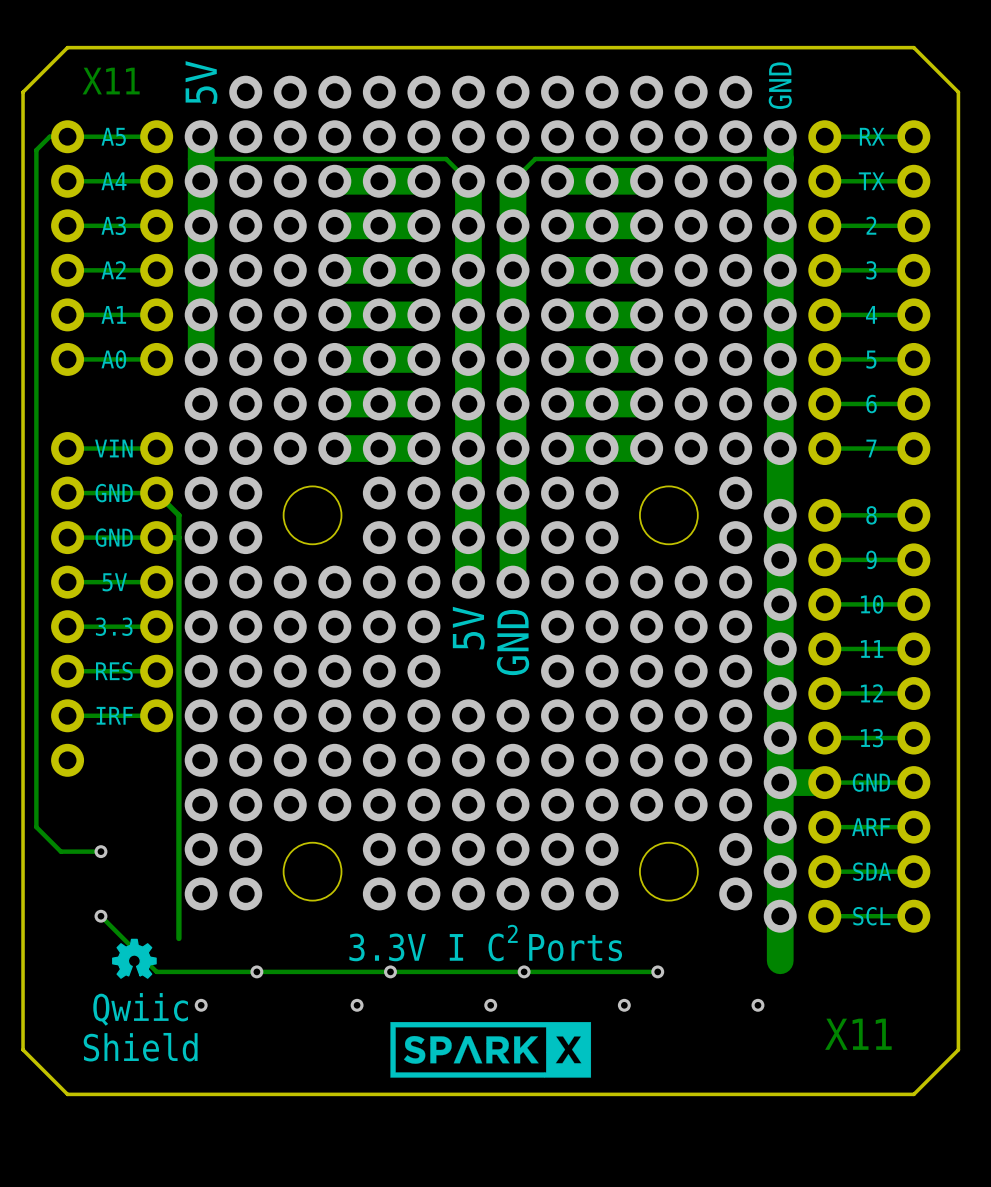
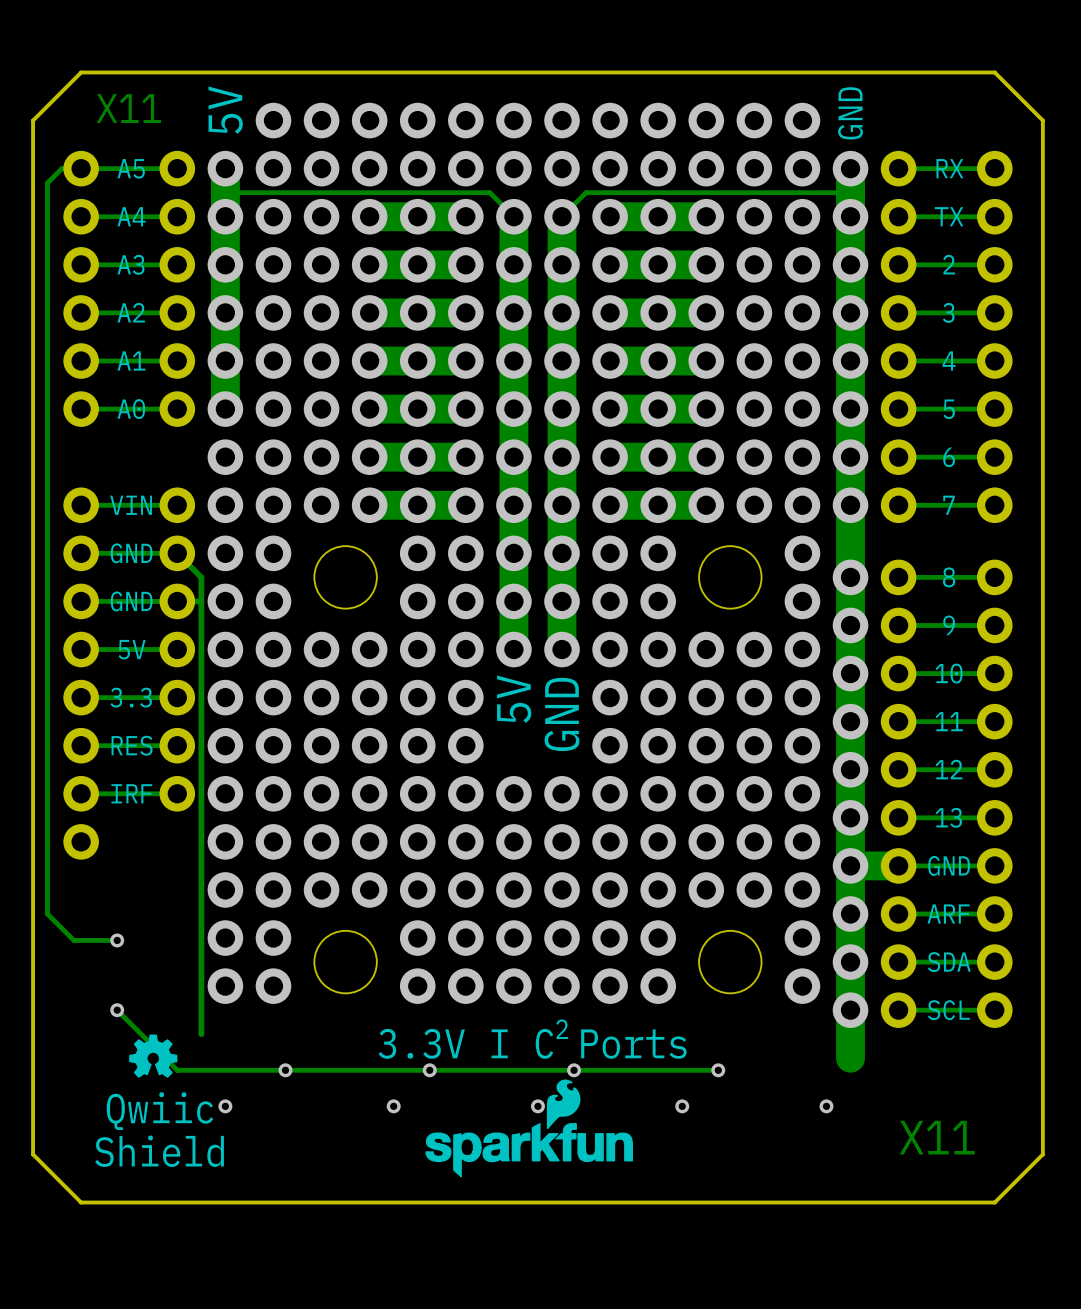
drawing: none -> [425, 1079, 633, 1178]
drawing: [390, 1022, 592, 1078] -> none

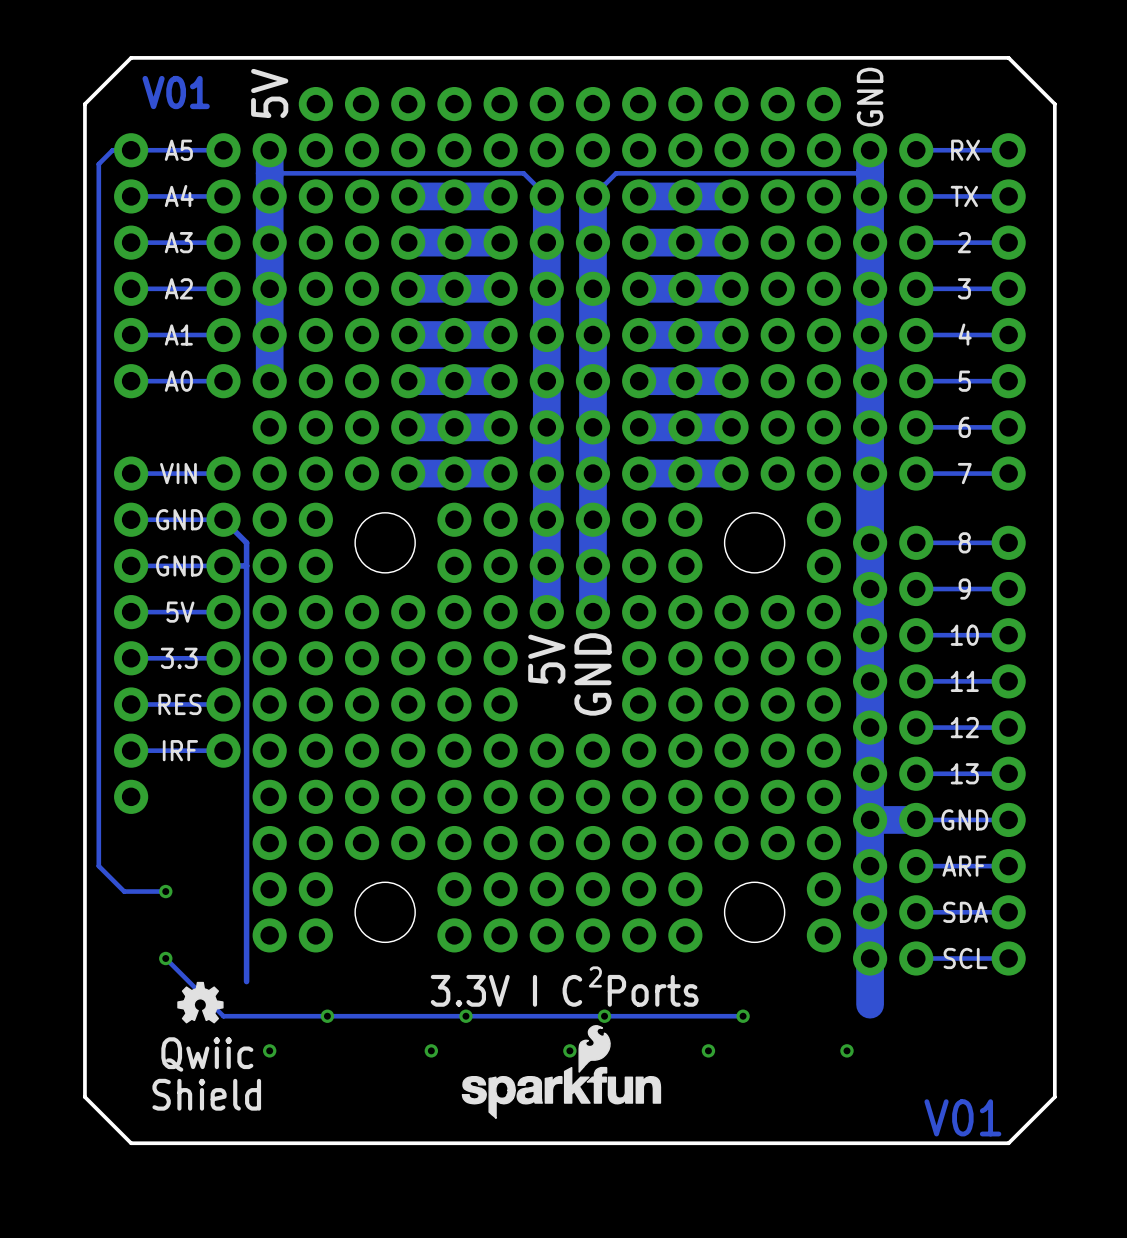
text: X11 (128, 108) -> V01 (176, 92)
text: X11 (937, 1137) -> none
text: none -> V01 (962, 1117)

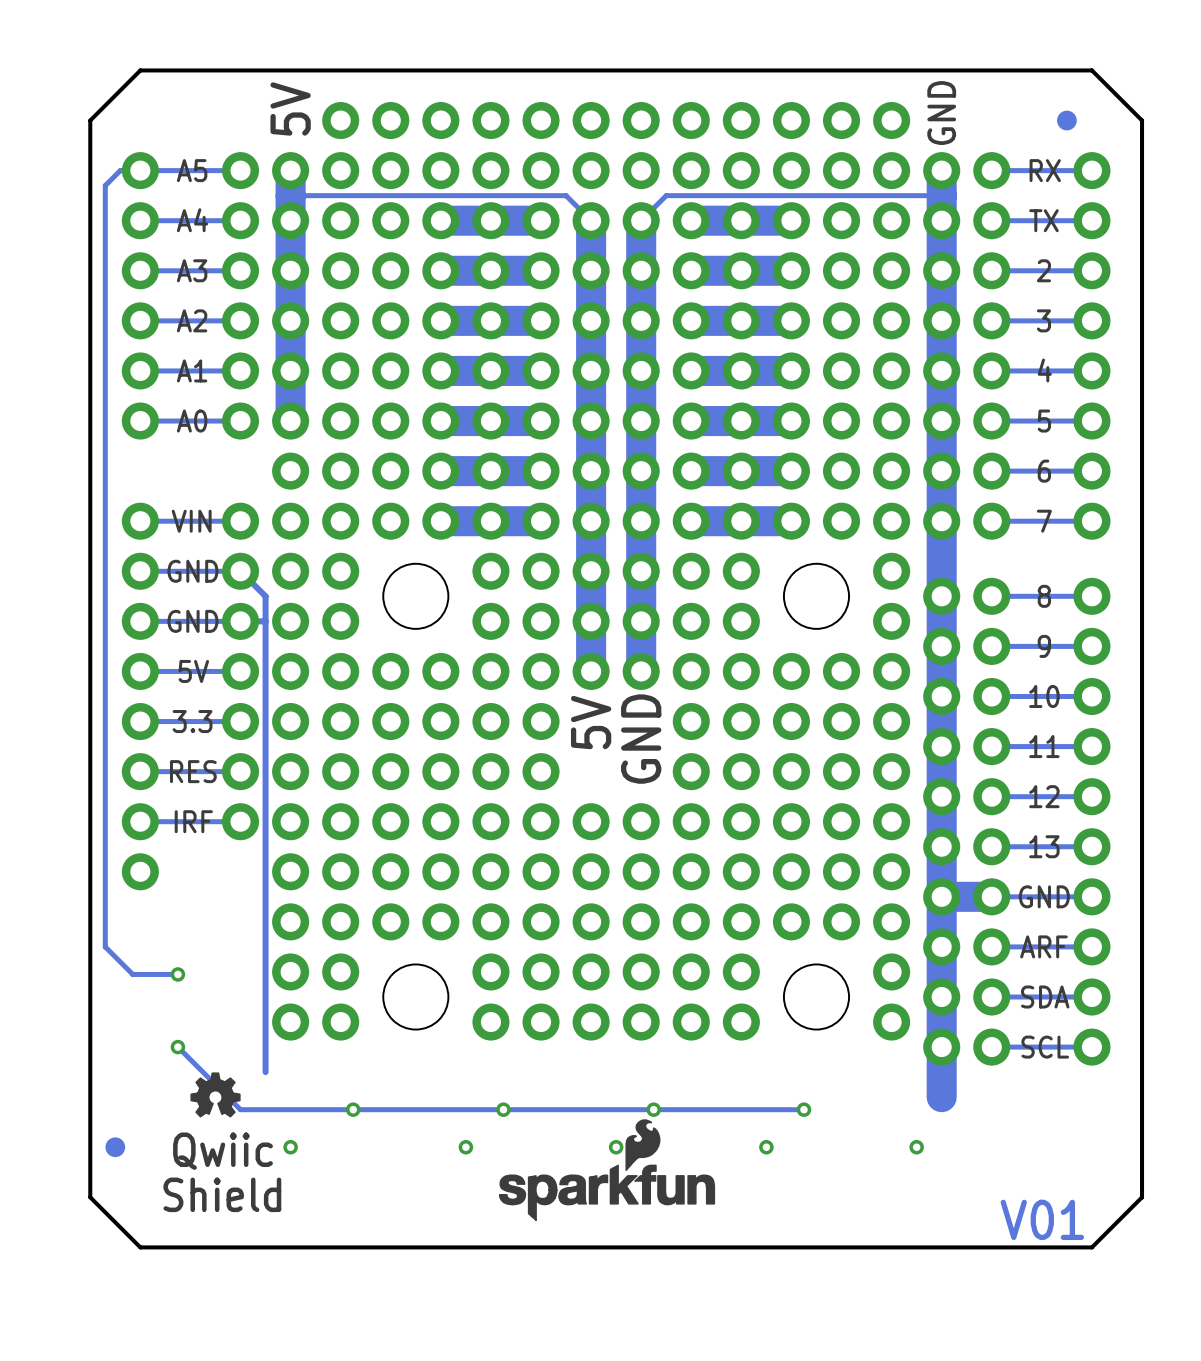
text: V01 (176, 92) -> none
part: none -> (1066, 120)
text: 2 (595, 976) -> none
text: 3.3V I C Ports (564, 990) -> none
part: none -> (115, 1147)

